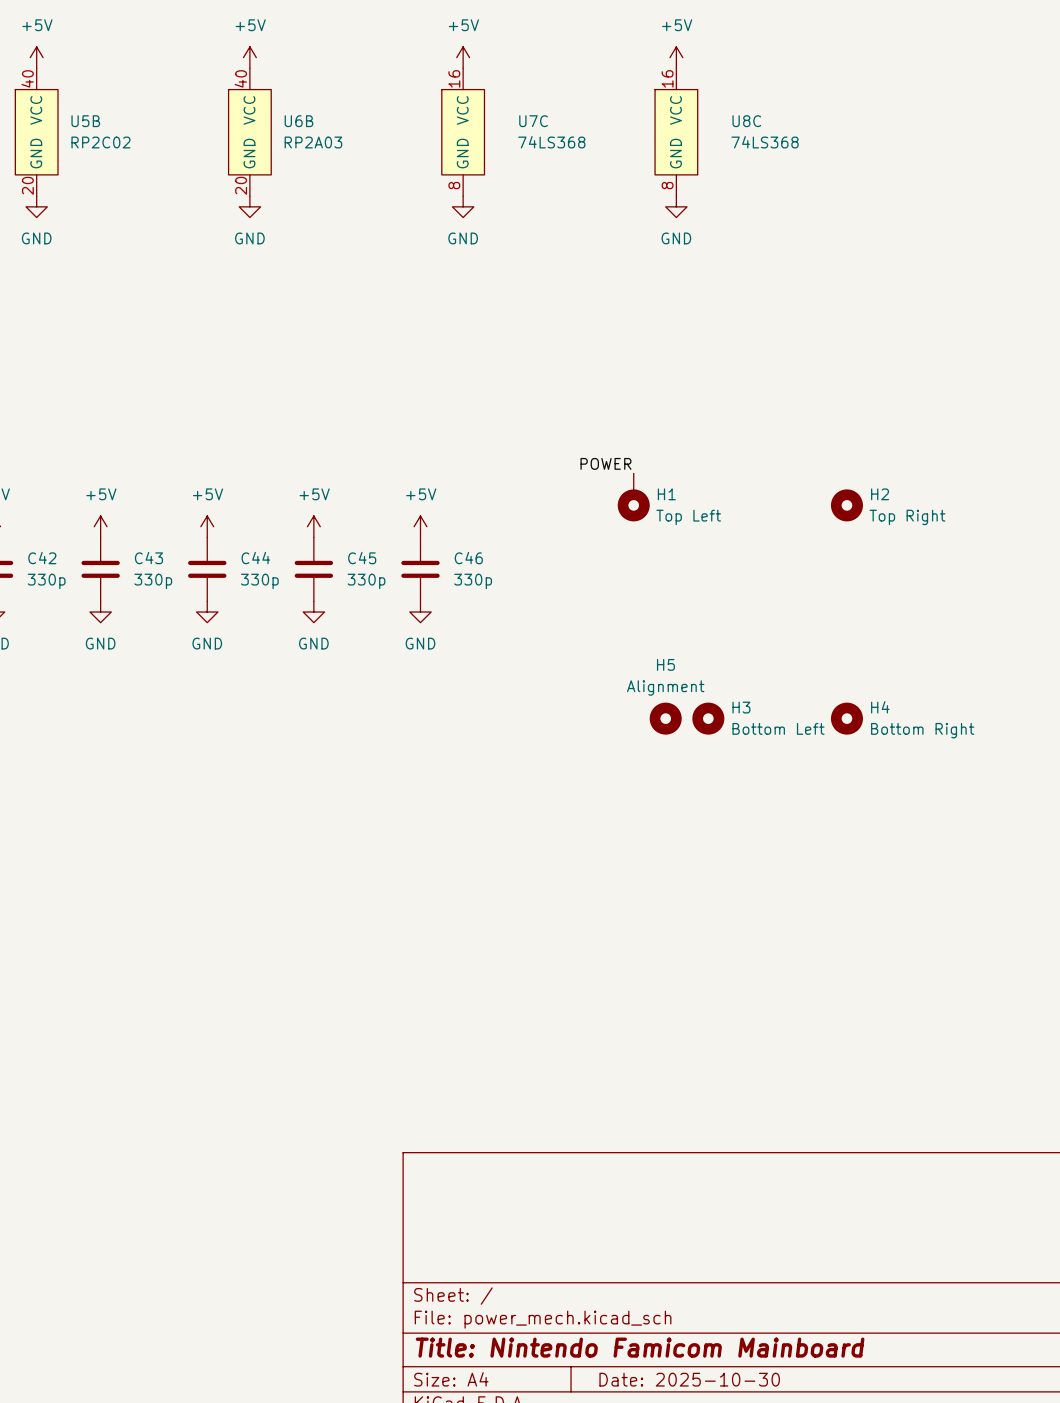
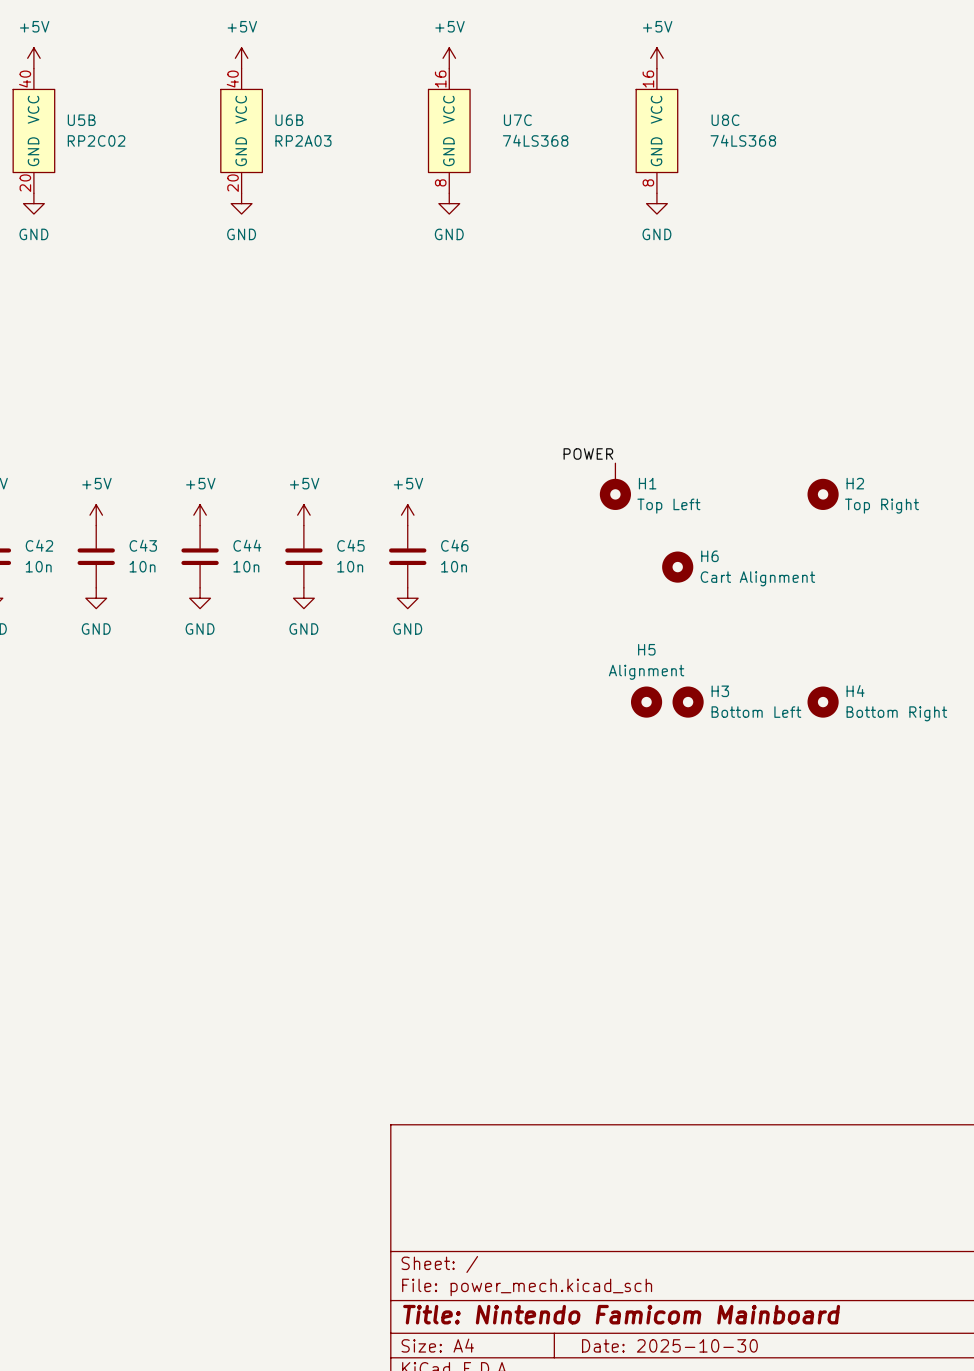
H6: none -> Cart Alignment (677, 567)
C42 value: 330p (46, 581) -> 10n (38, 566)
C43 value: 330p (153, 581) -> 10n (142, 566)
C44 value: 330p (259, 581) -> 10n (246, 566)
C45 value: 330p (366, 581) -> 10n (350, 566)
C46 value: 330p (473, 581) -> 10n (454, 566)

